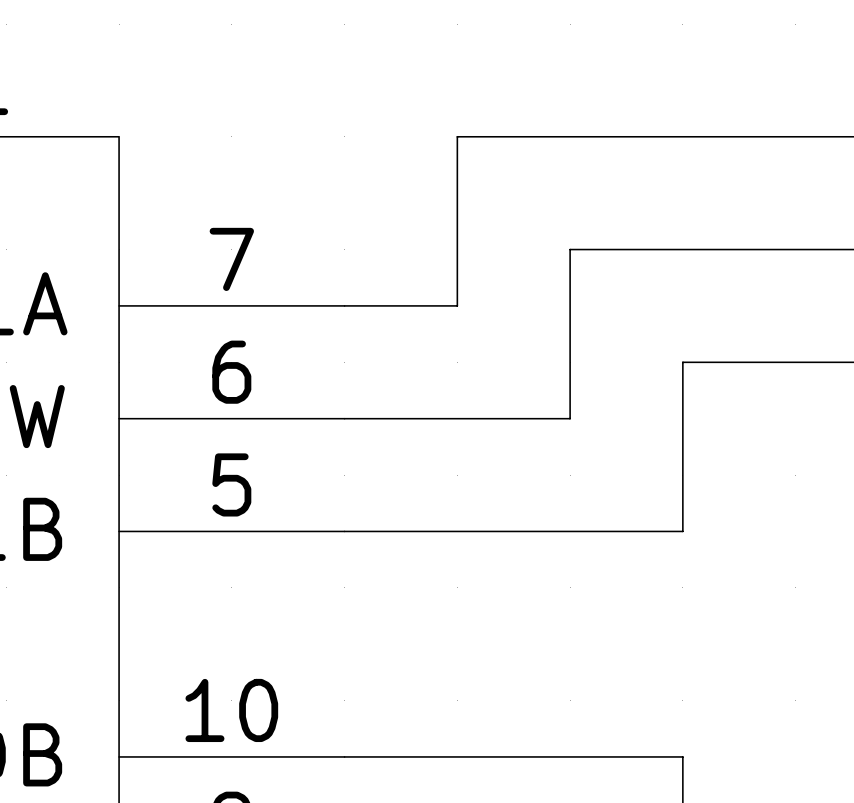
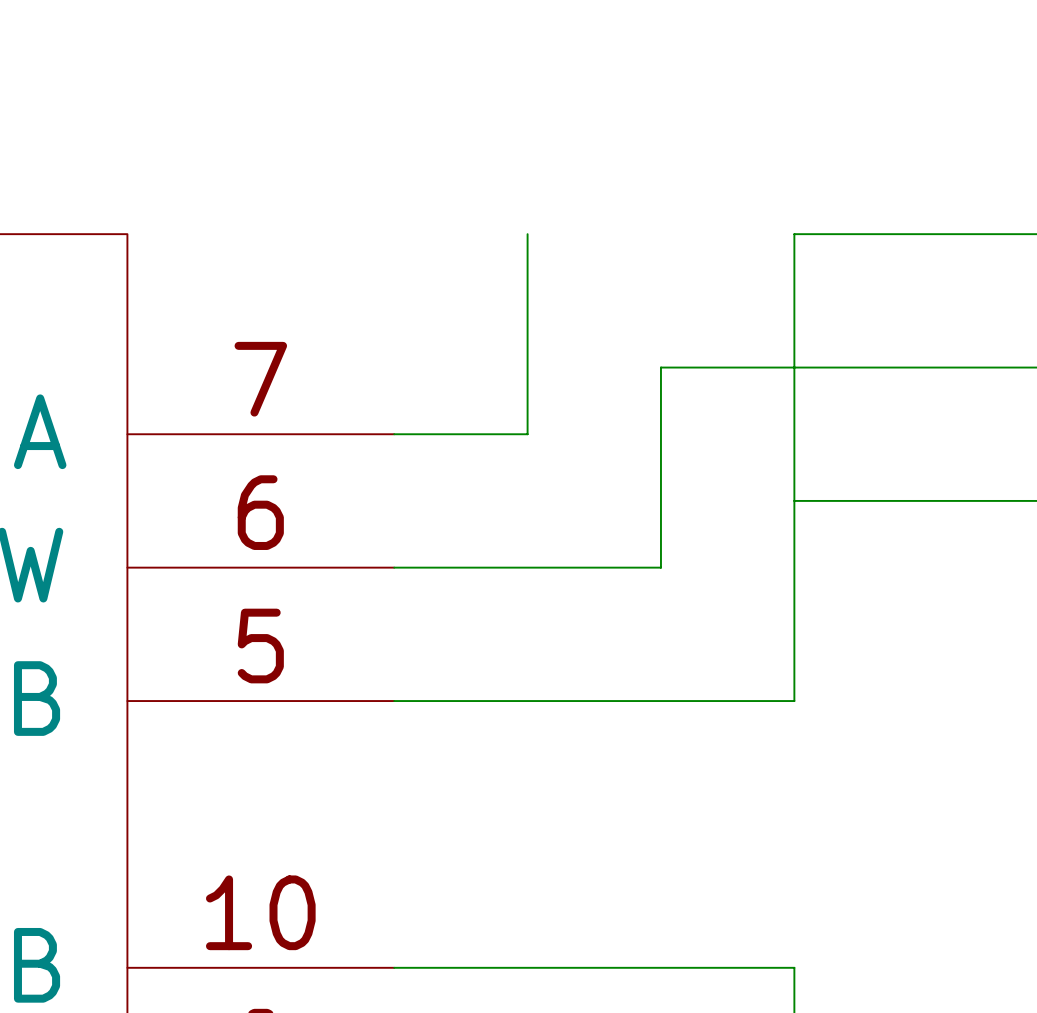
wire: (457, 136) (682, 136) -> (794, 500) (794, 234)

